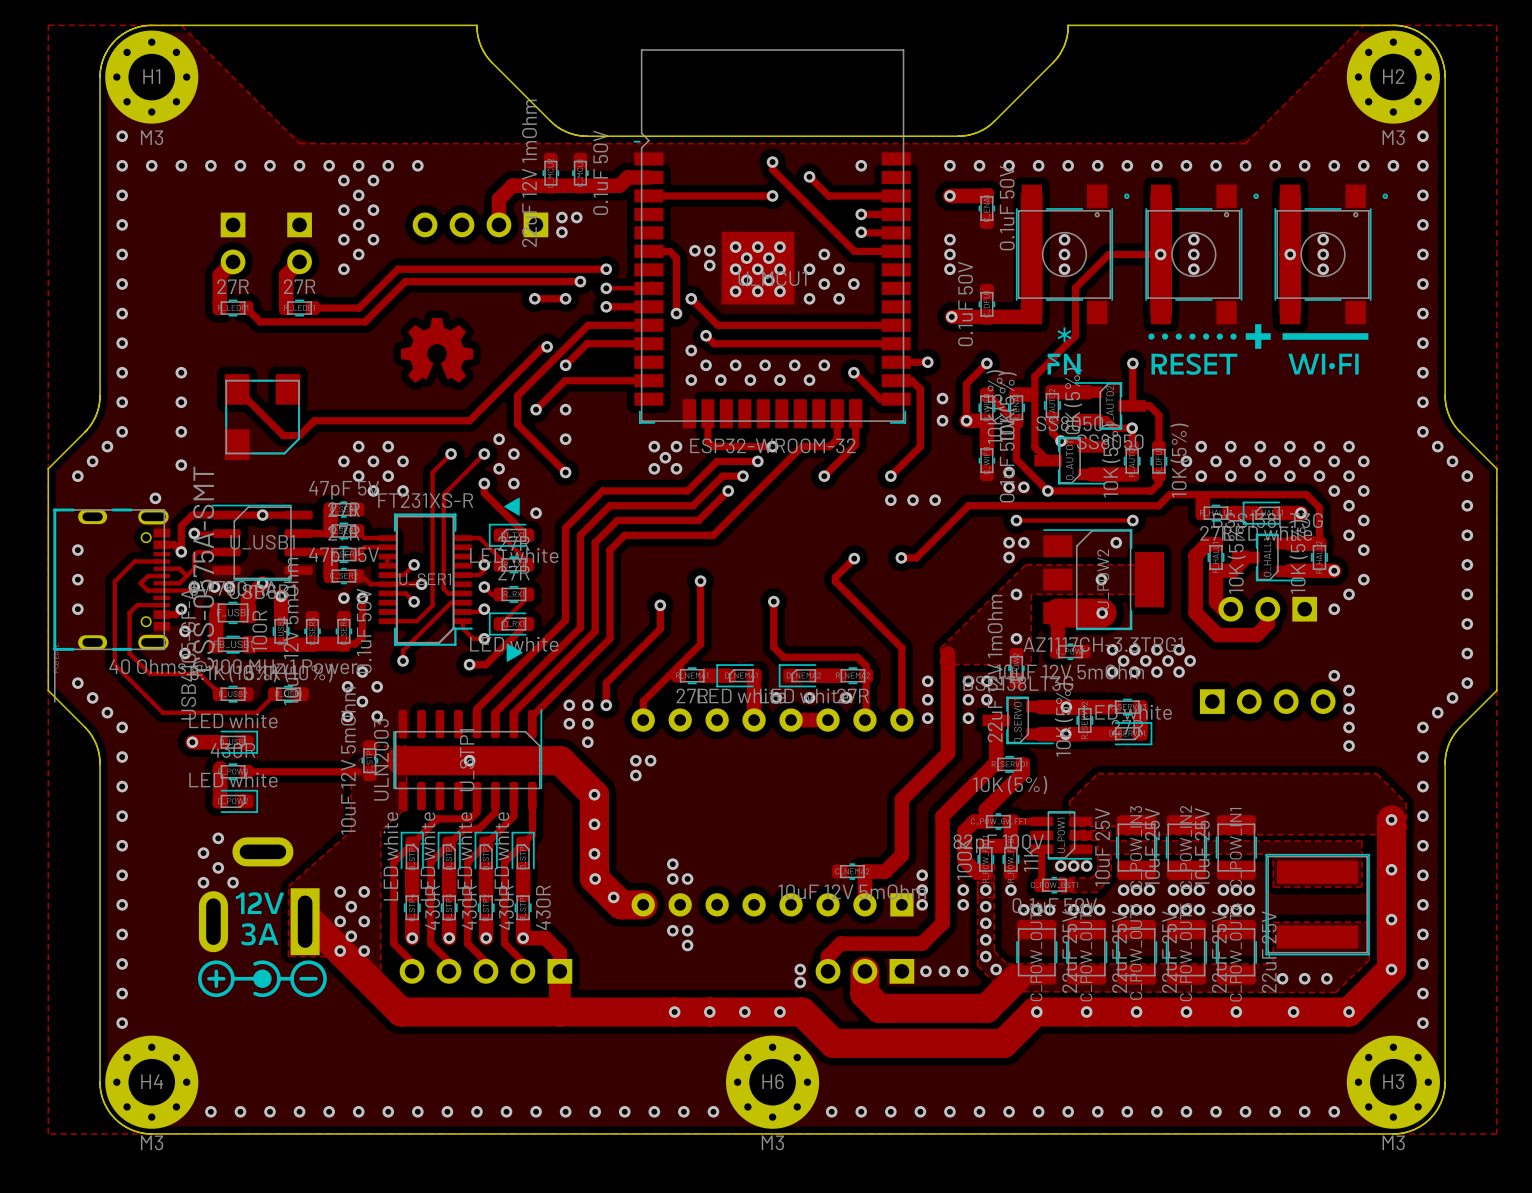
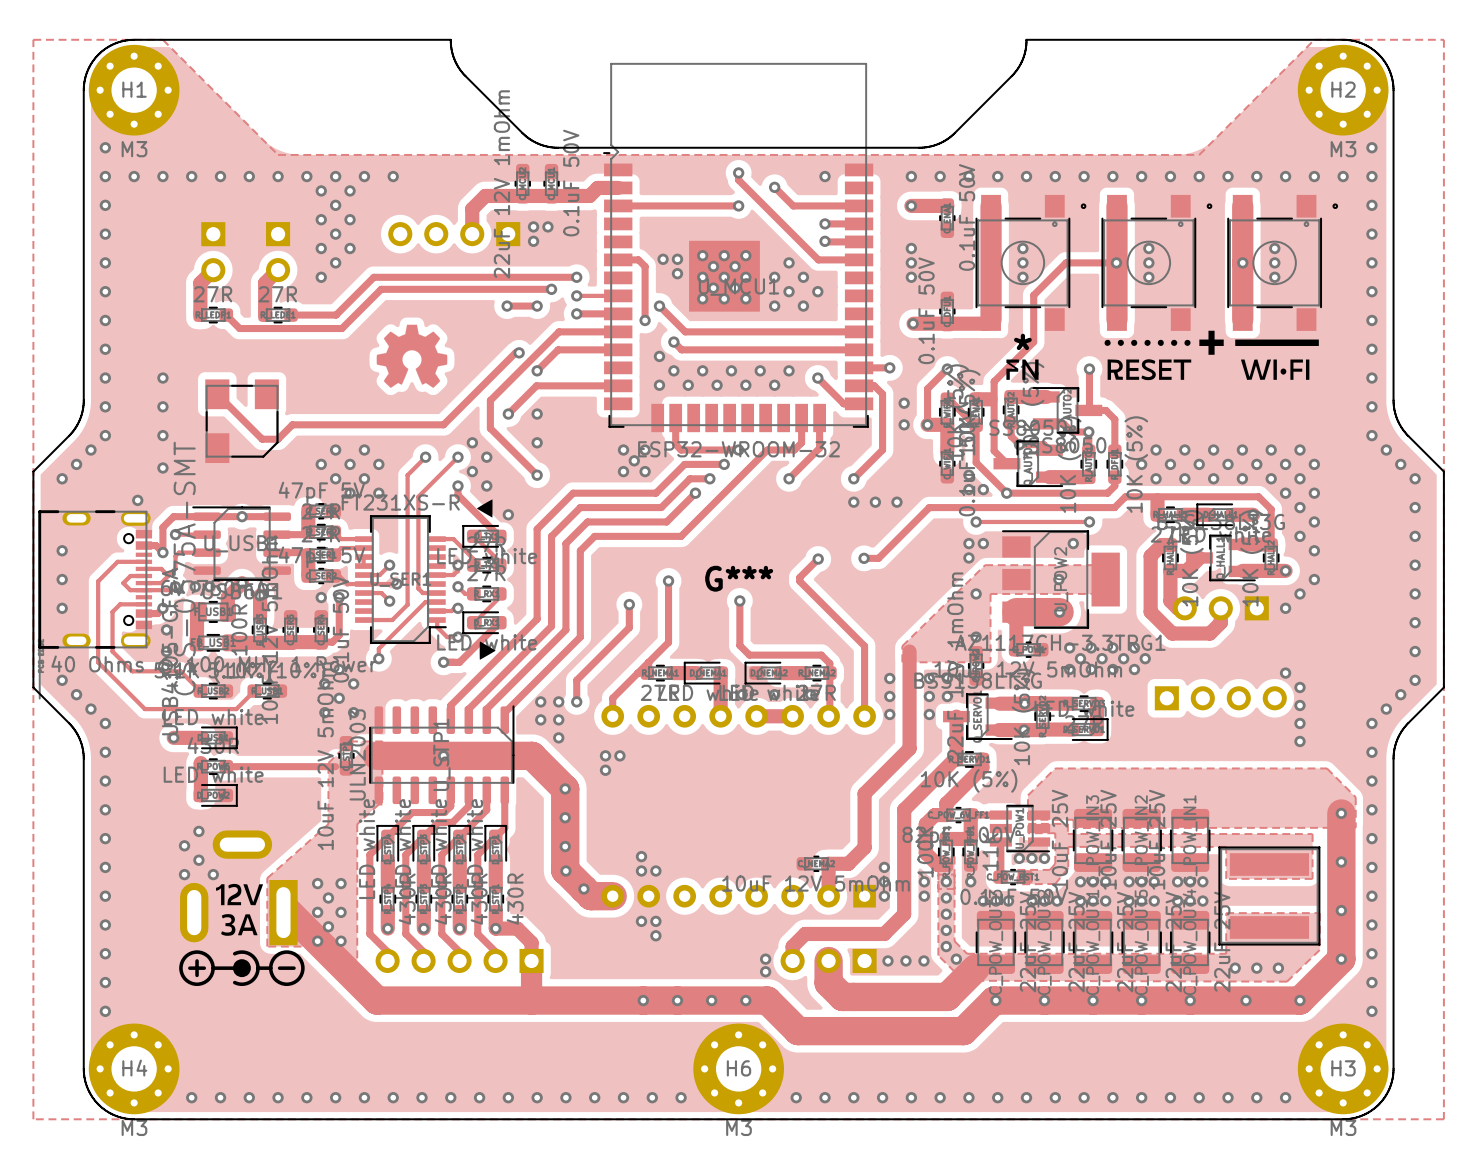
G***: none -> (767, 633)

